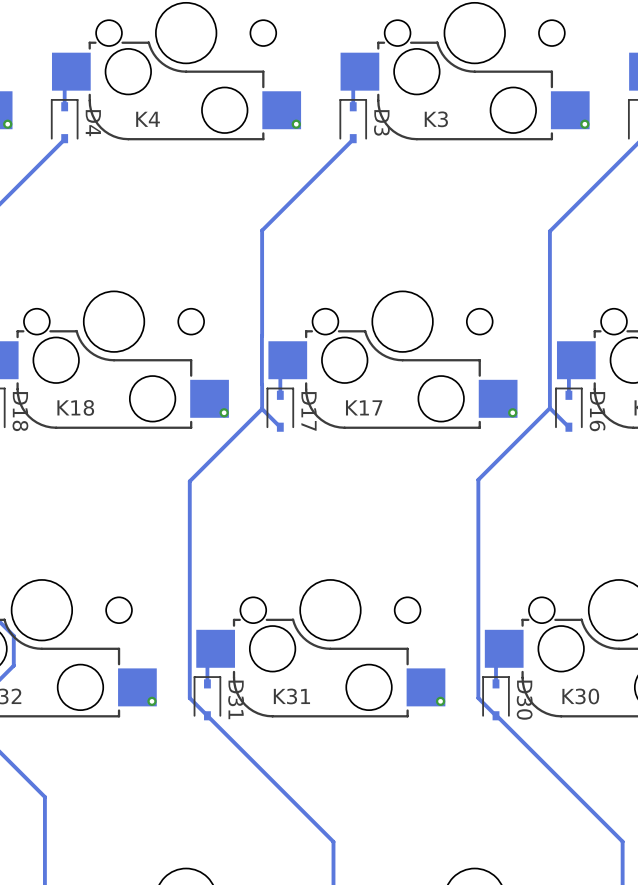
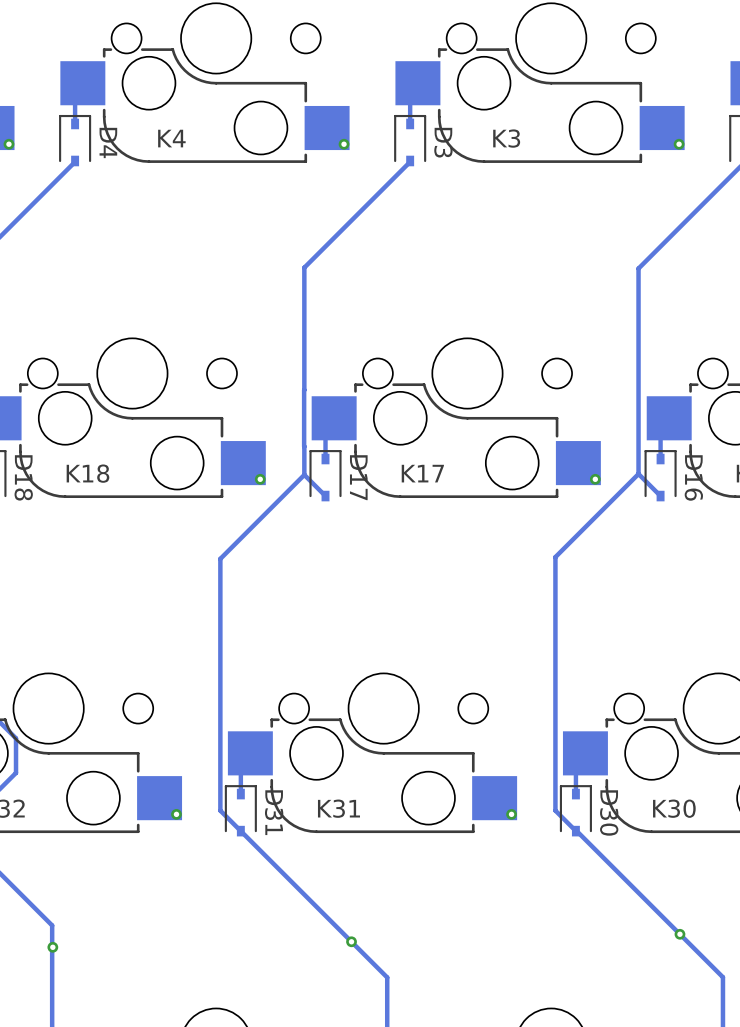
via: none -> (679, 934)
via: none -> (351, 941)
via: none -> (52, 947)

